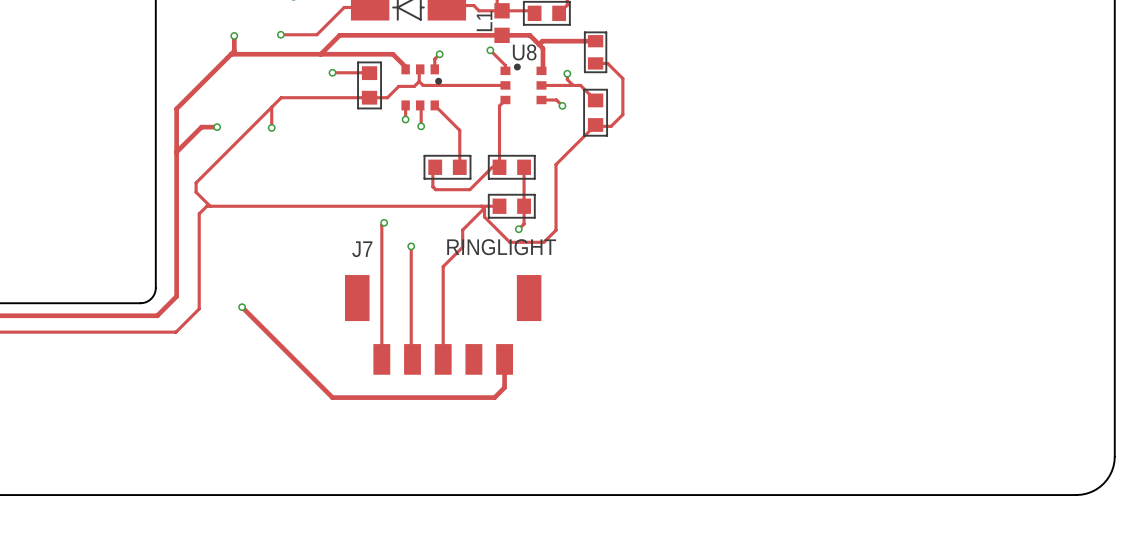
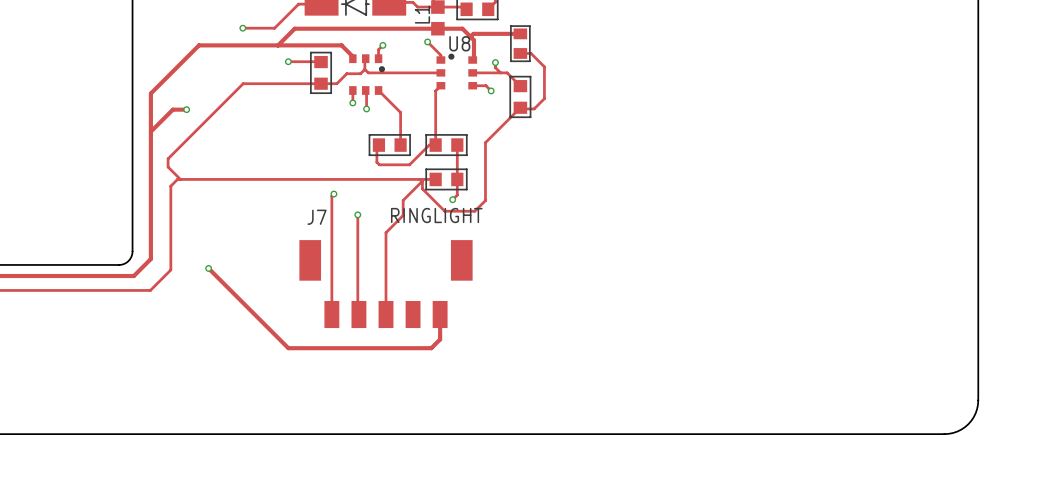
track: (234, 35) (234, 51) (231, 54) -> none
via: (234, 35) -> none
track: (271, 107) (271, 127) -> none
via: (271, 127) -> none

